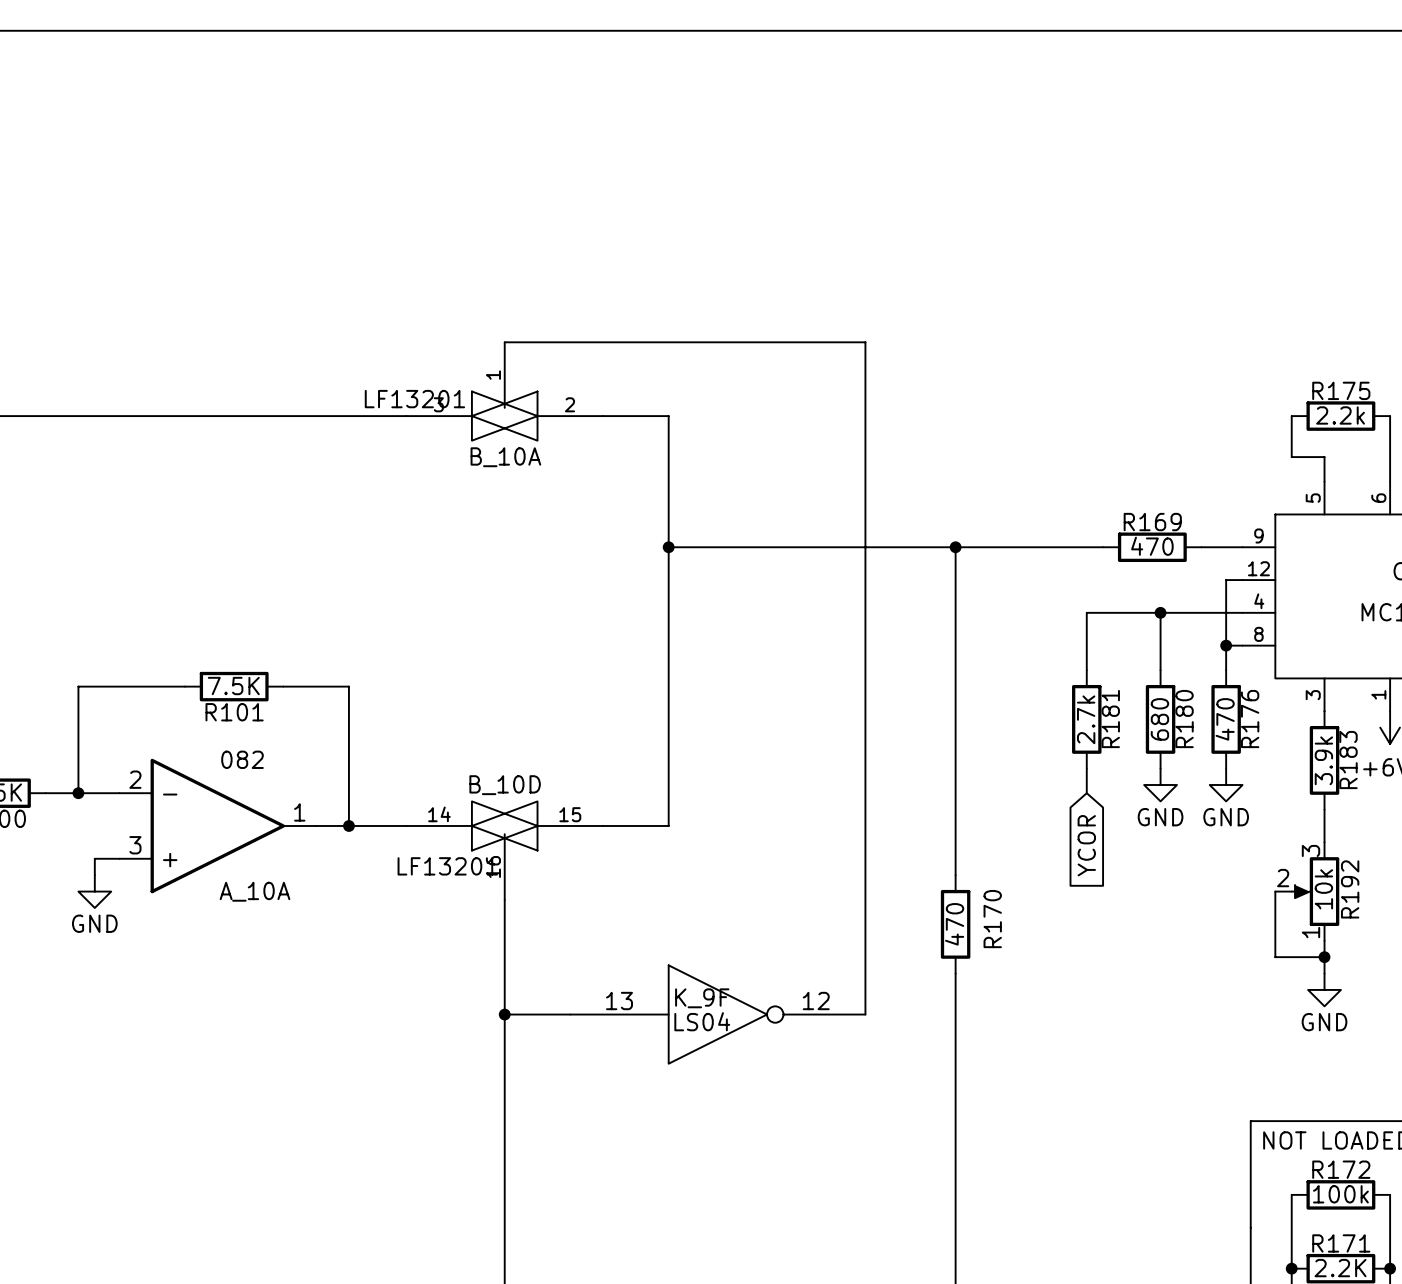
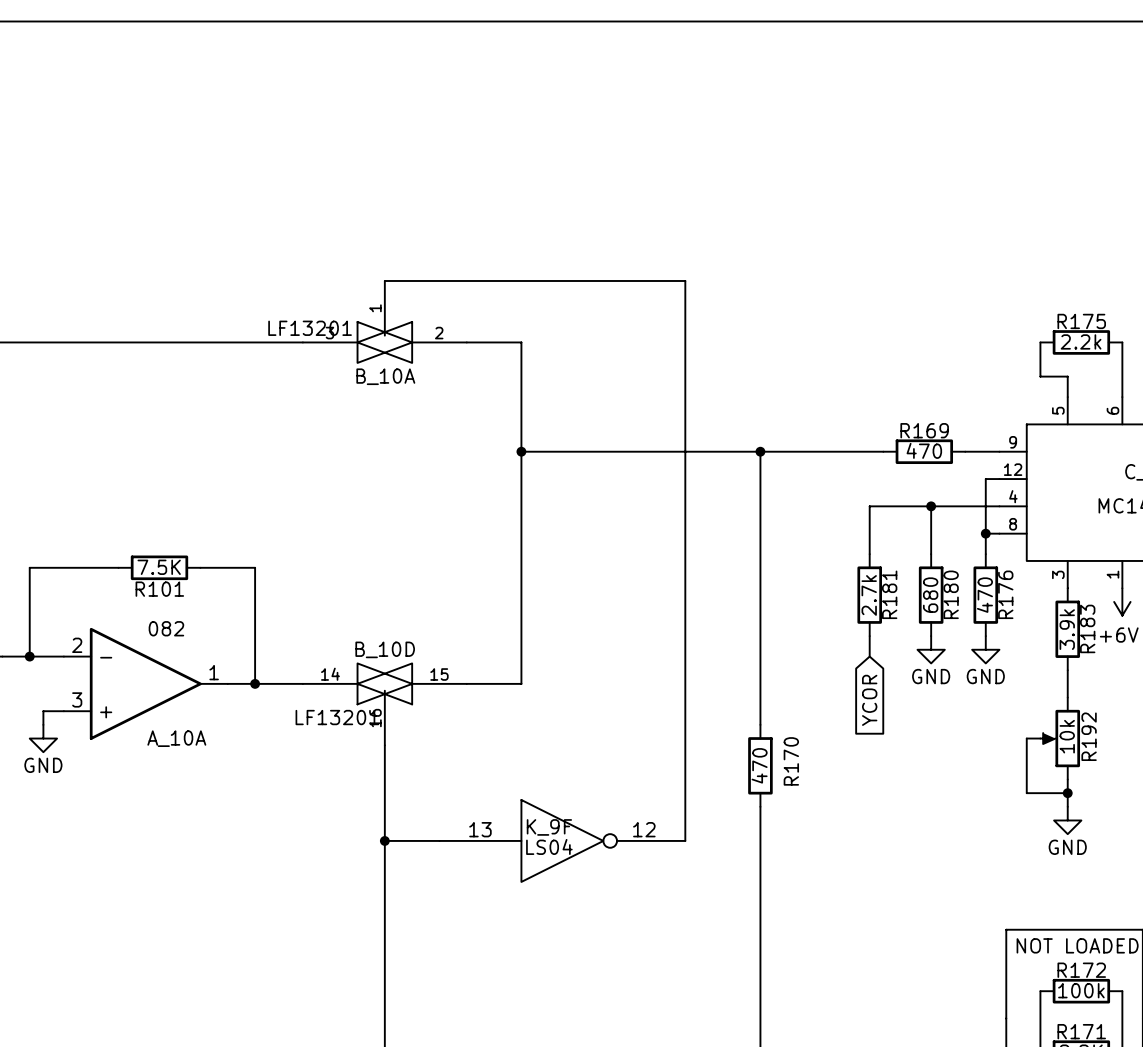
R192 pin number: 3 (1311, 850) -> none
R192 pin number: 2 (1283, 878) -> none
R192 pin number: 1 (1311, 932) -> none

